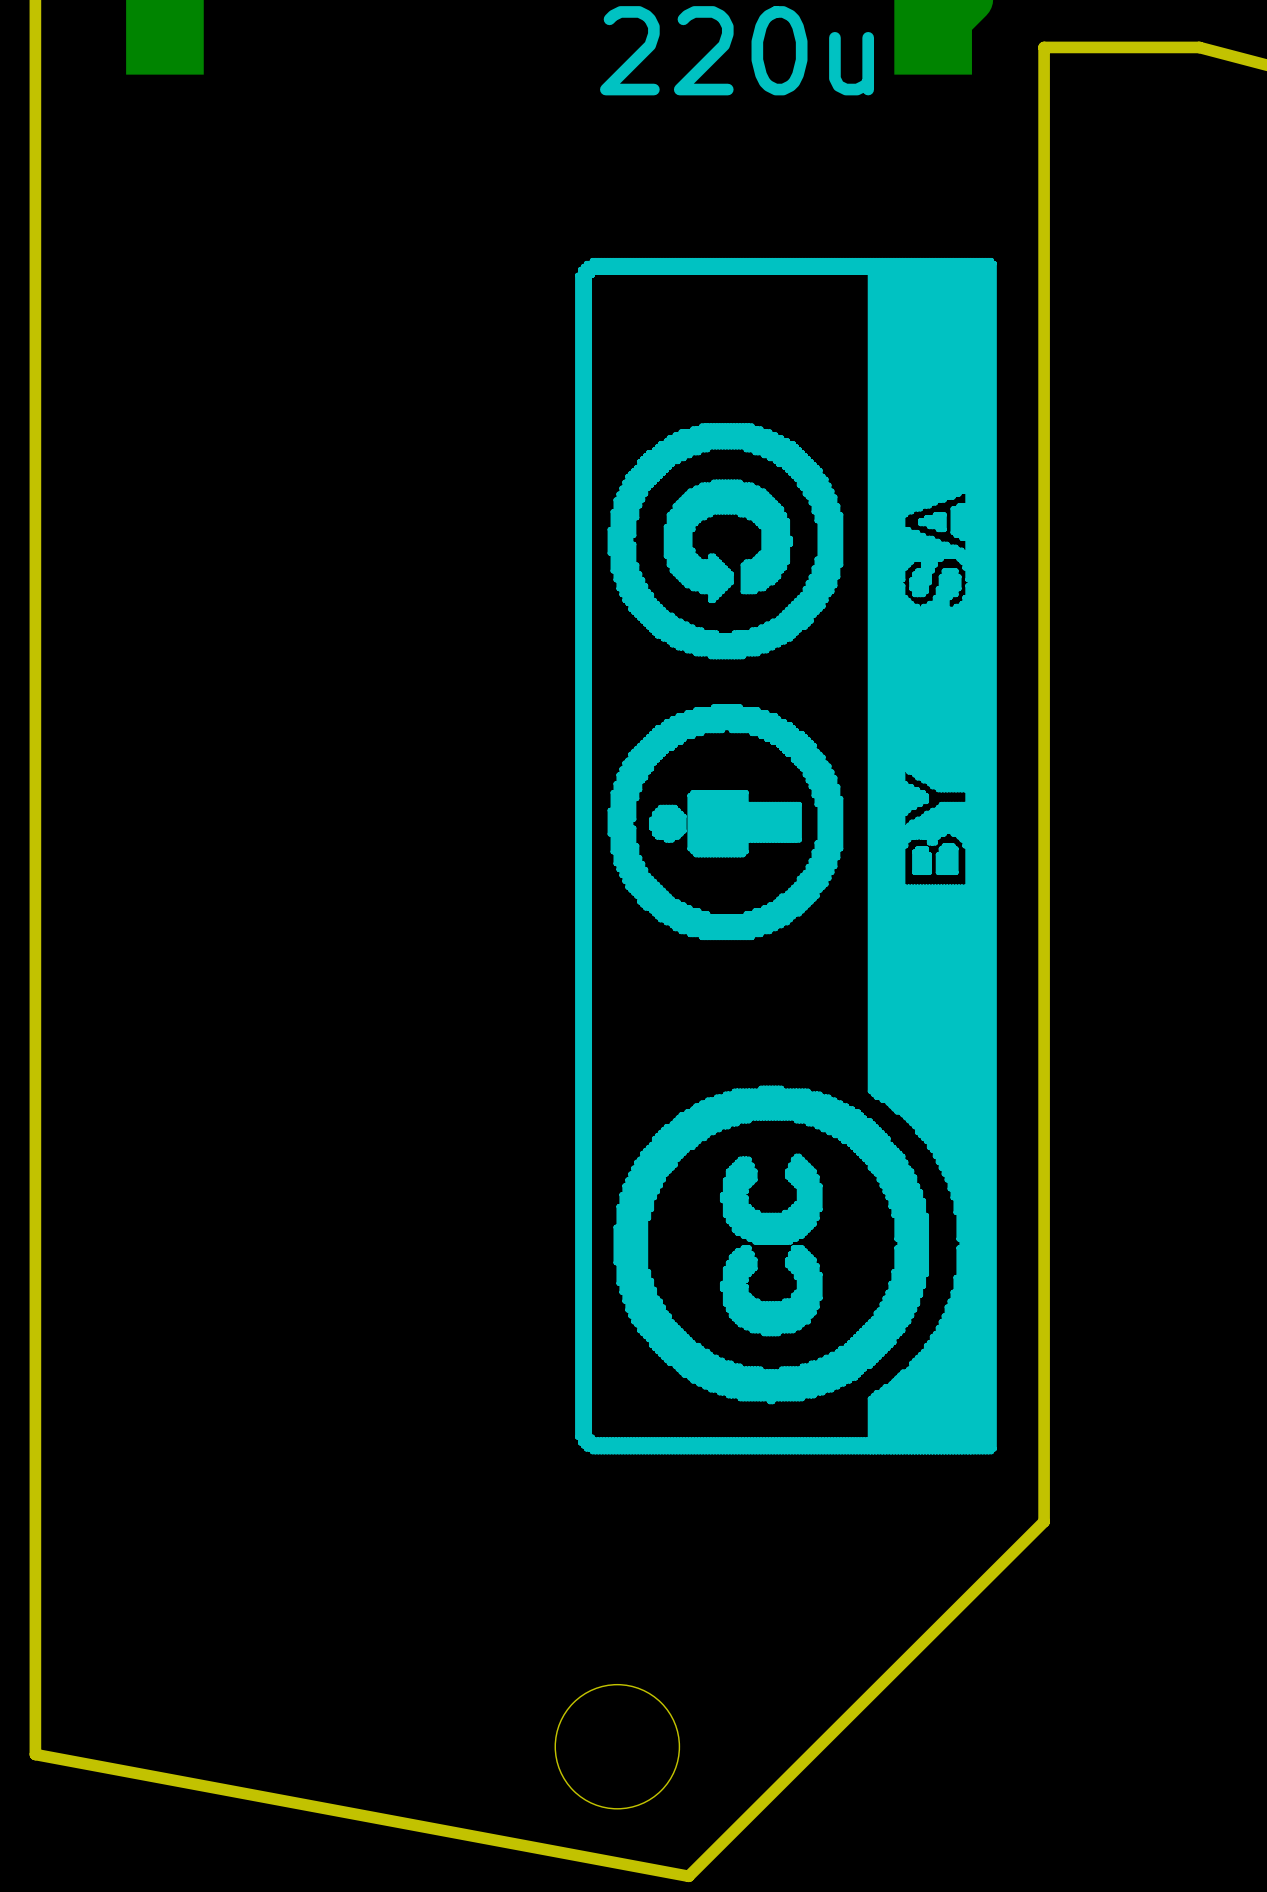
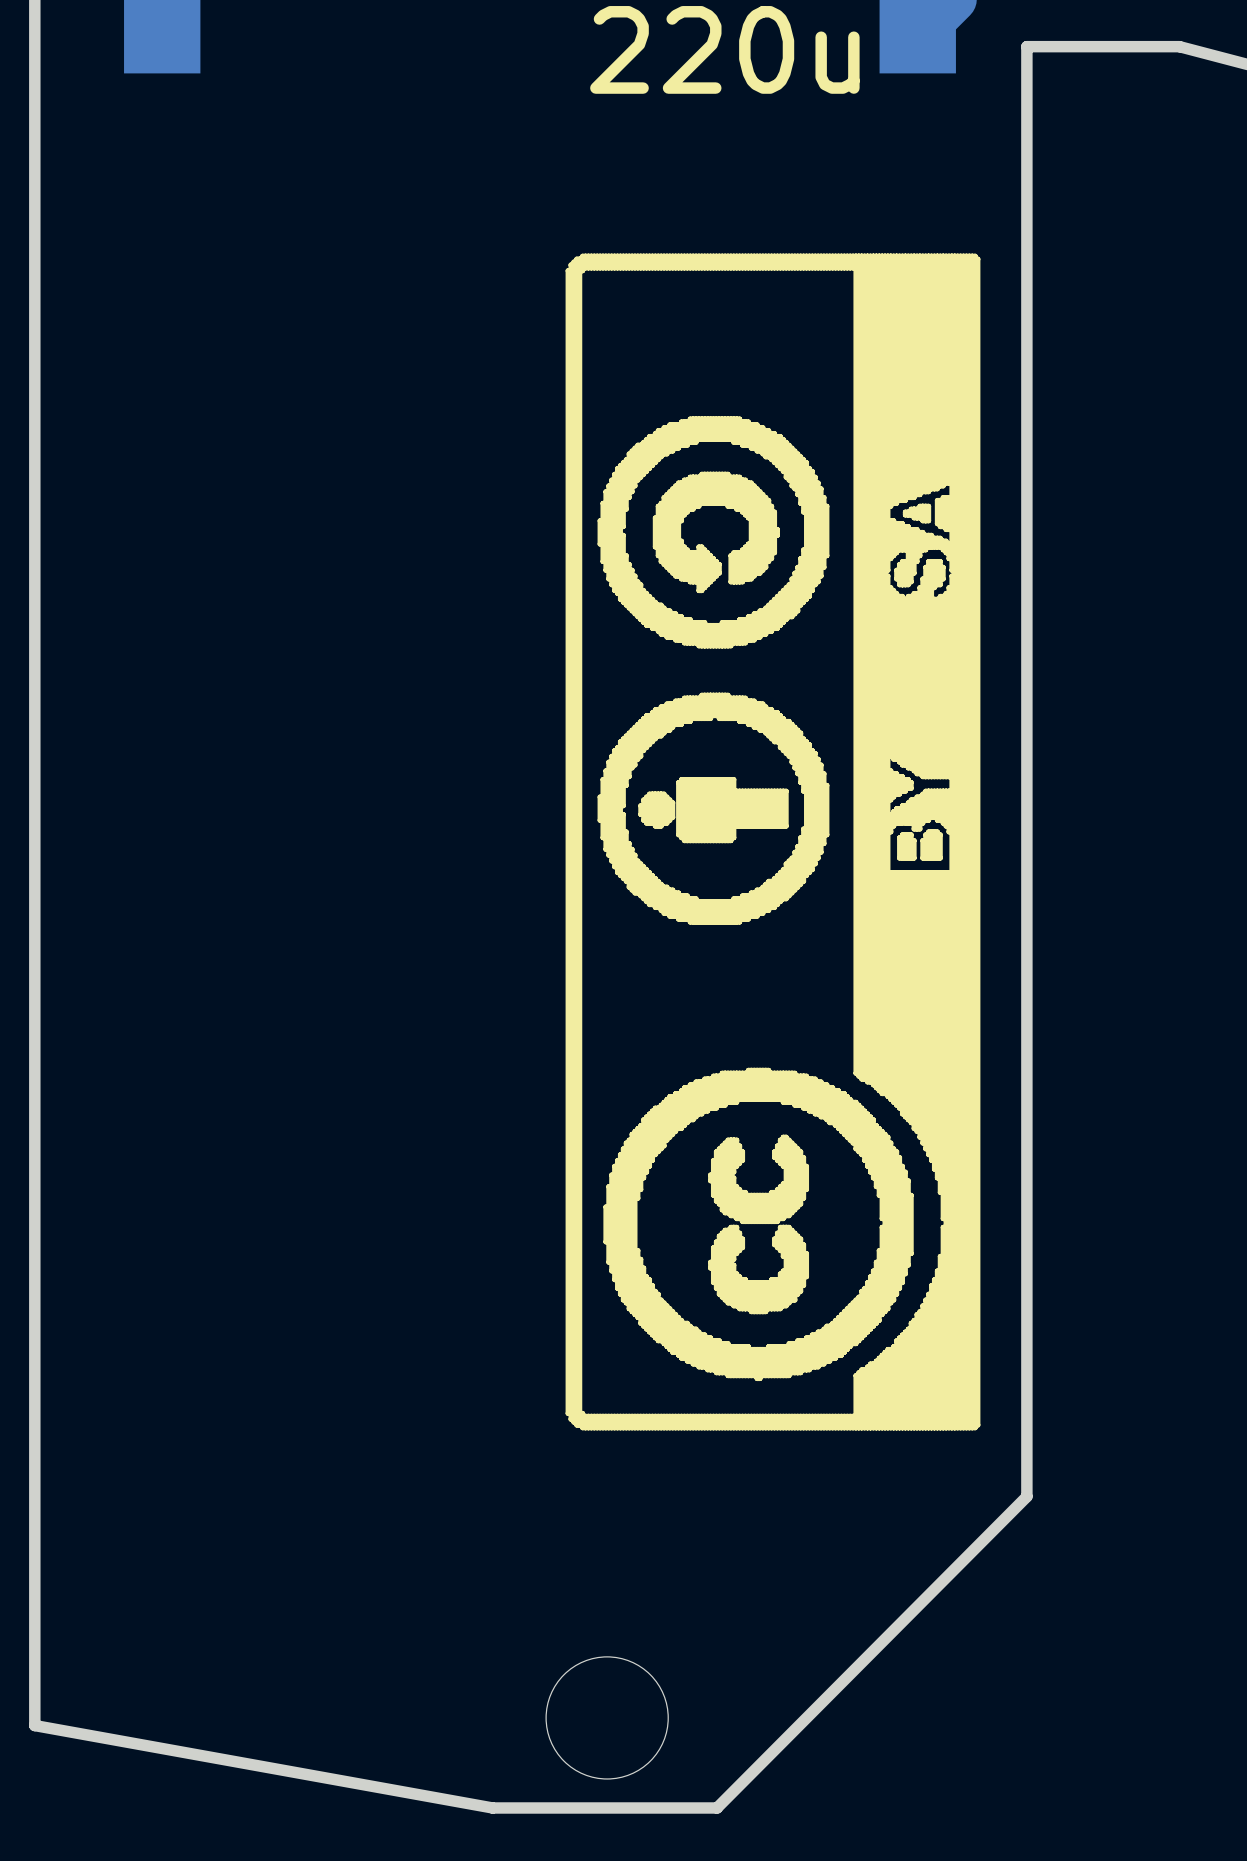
board edge: (1044, 1521) (688, 1876) (35, 1754) -> (1026, 1496) (717, 1807) (492, 1807) (34, 1725)

